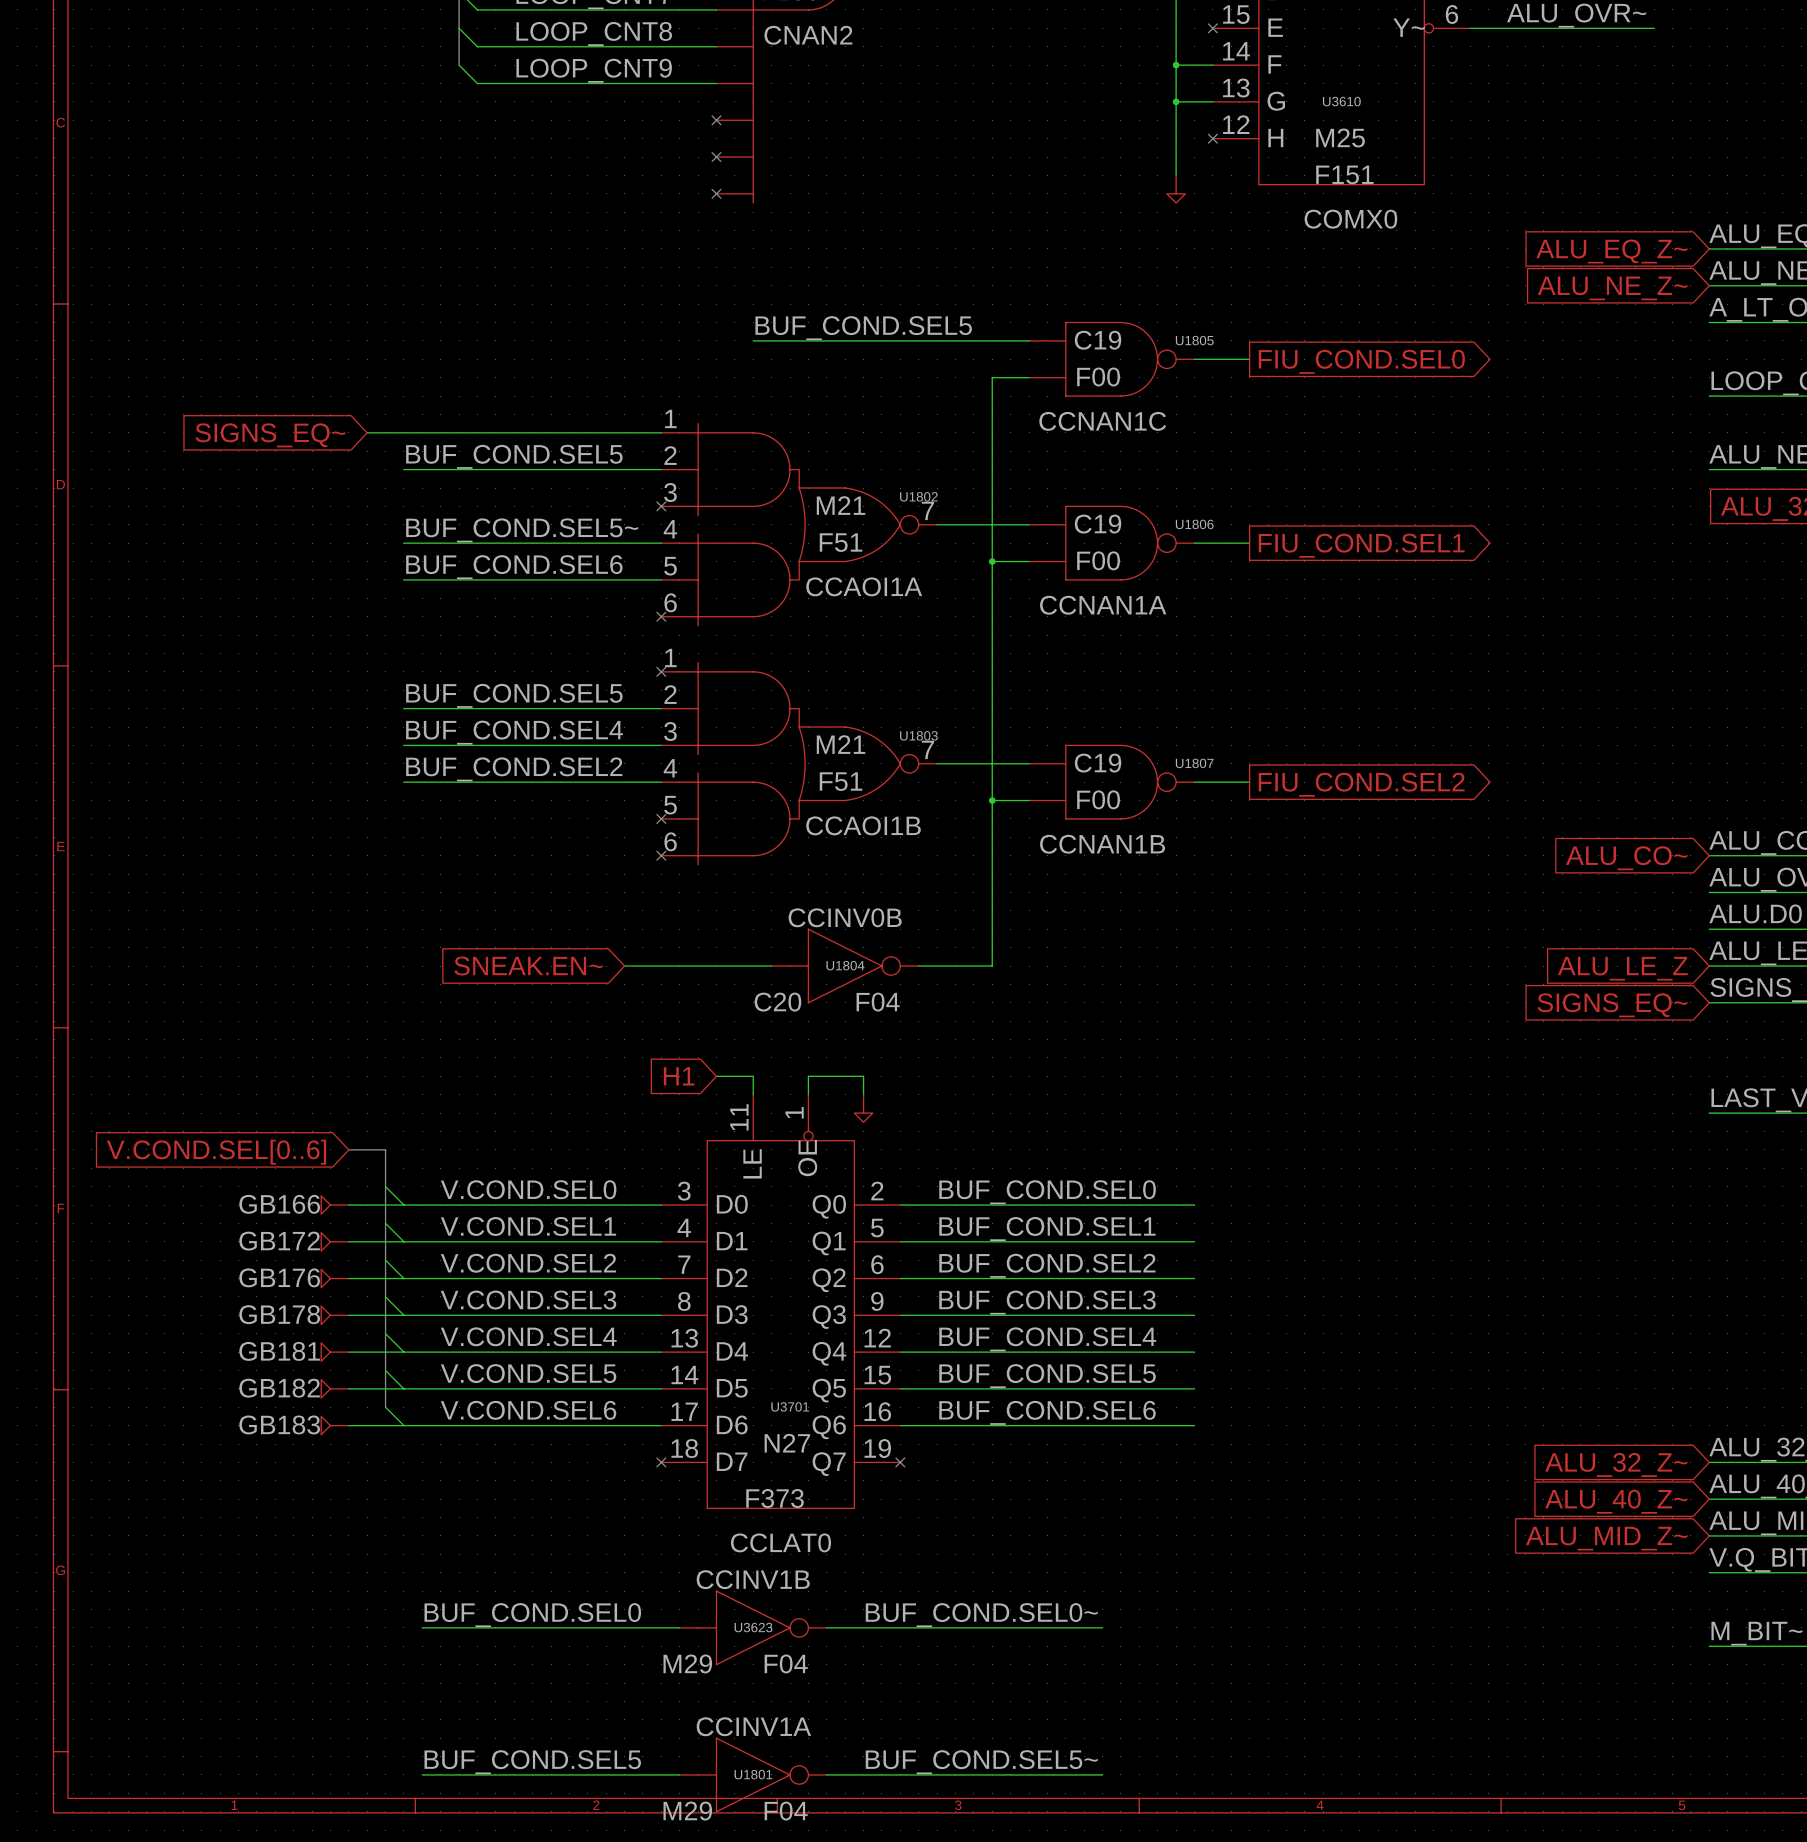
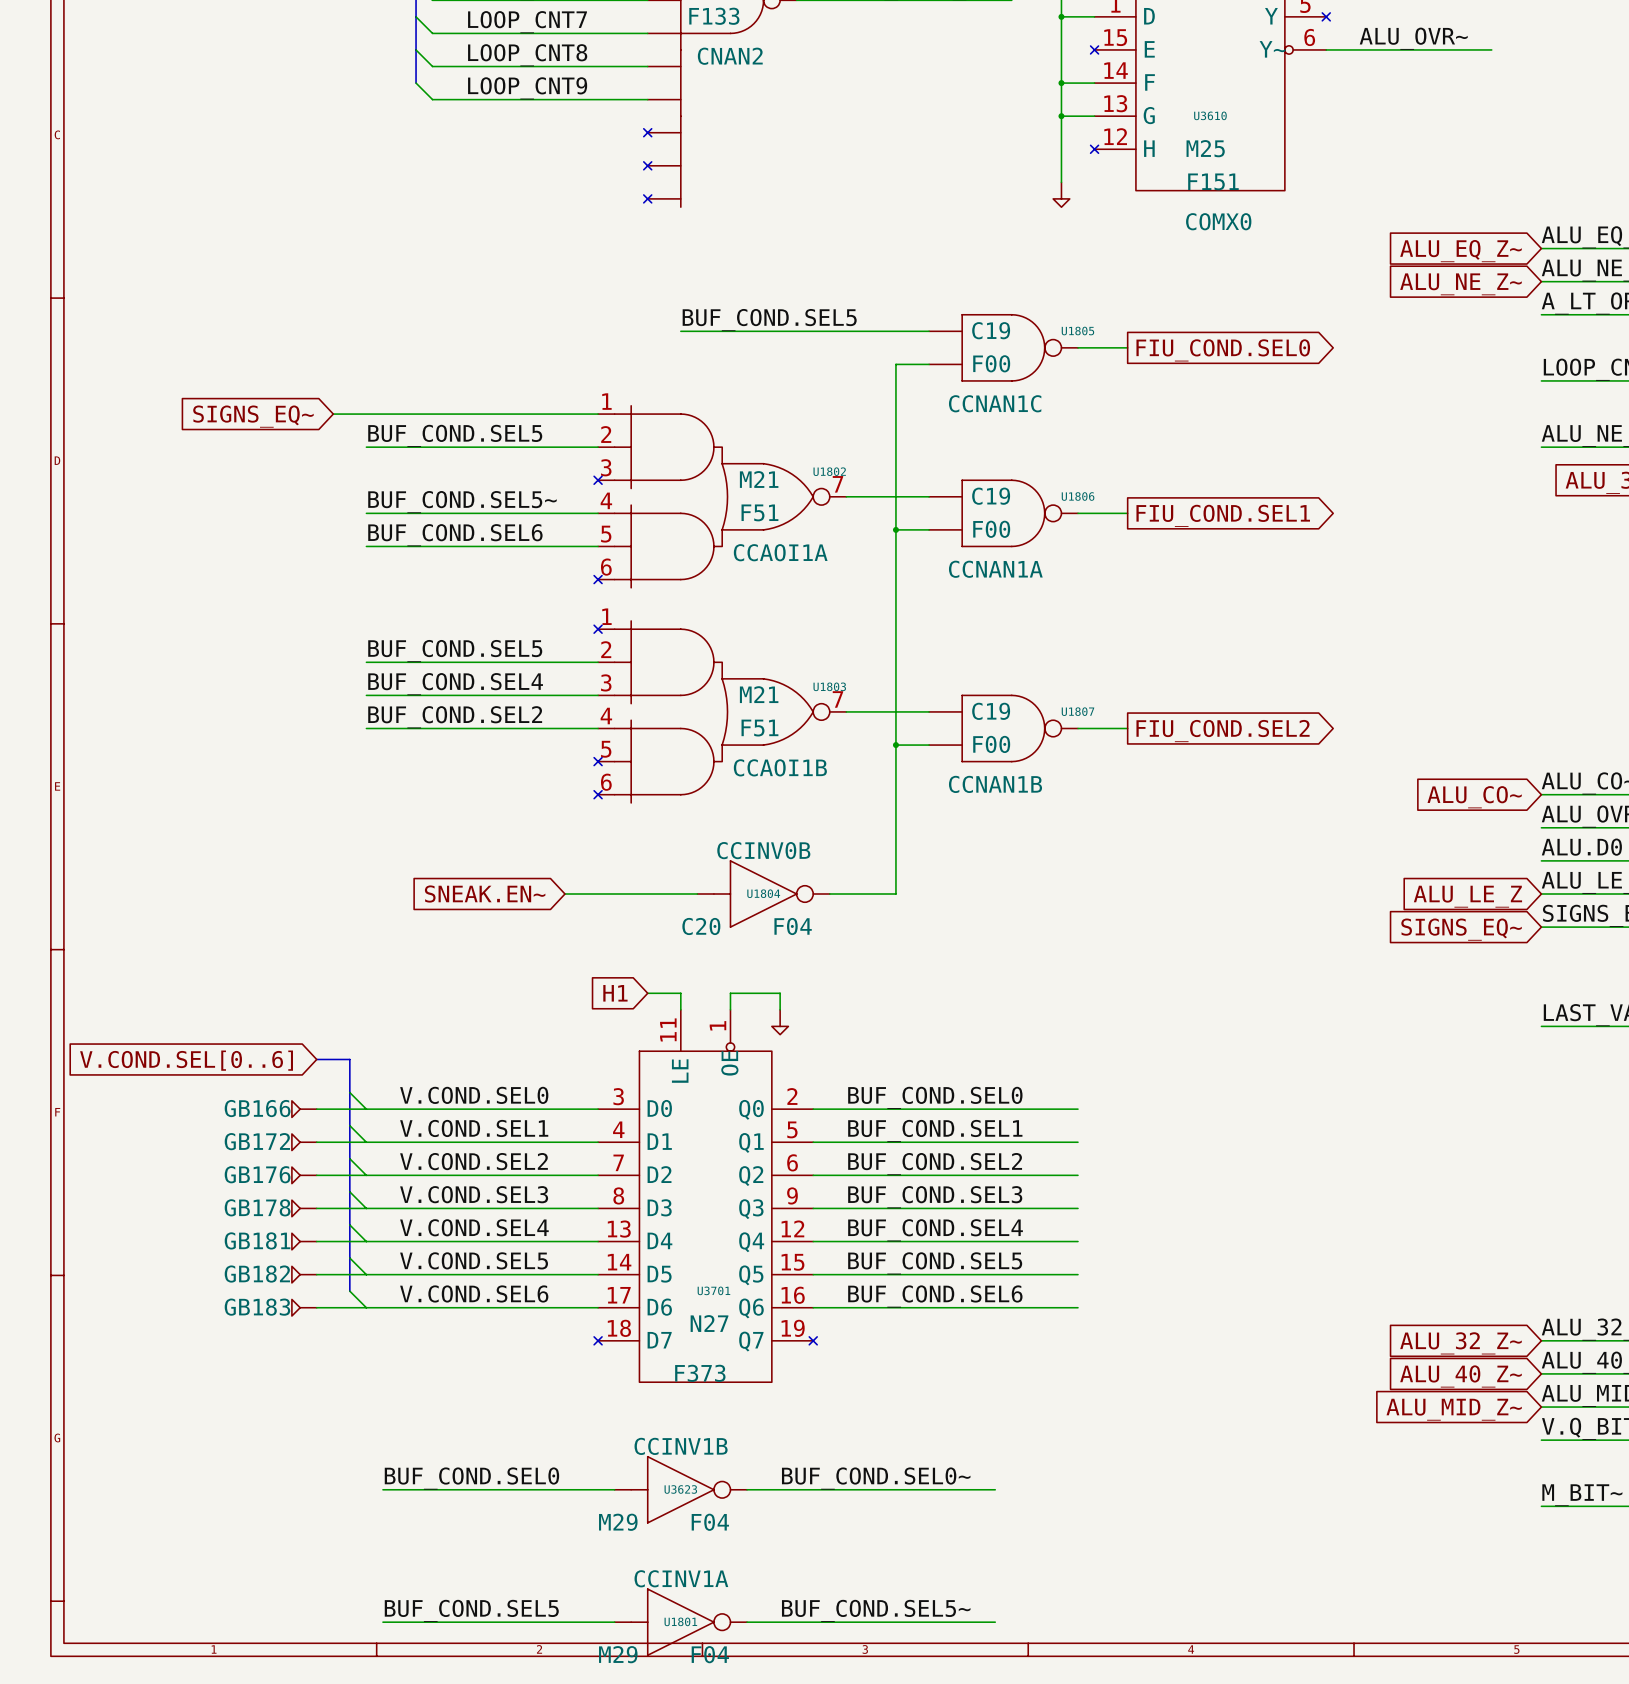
U3701 text: CCLAT0 (780, 1542) -> none

